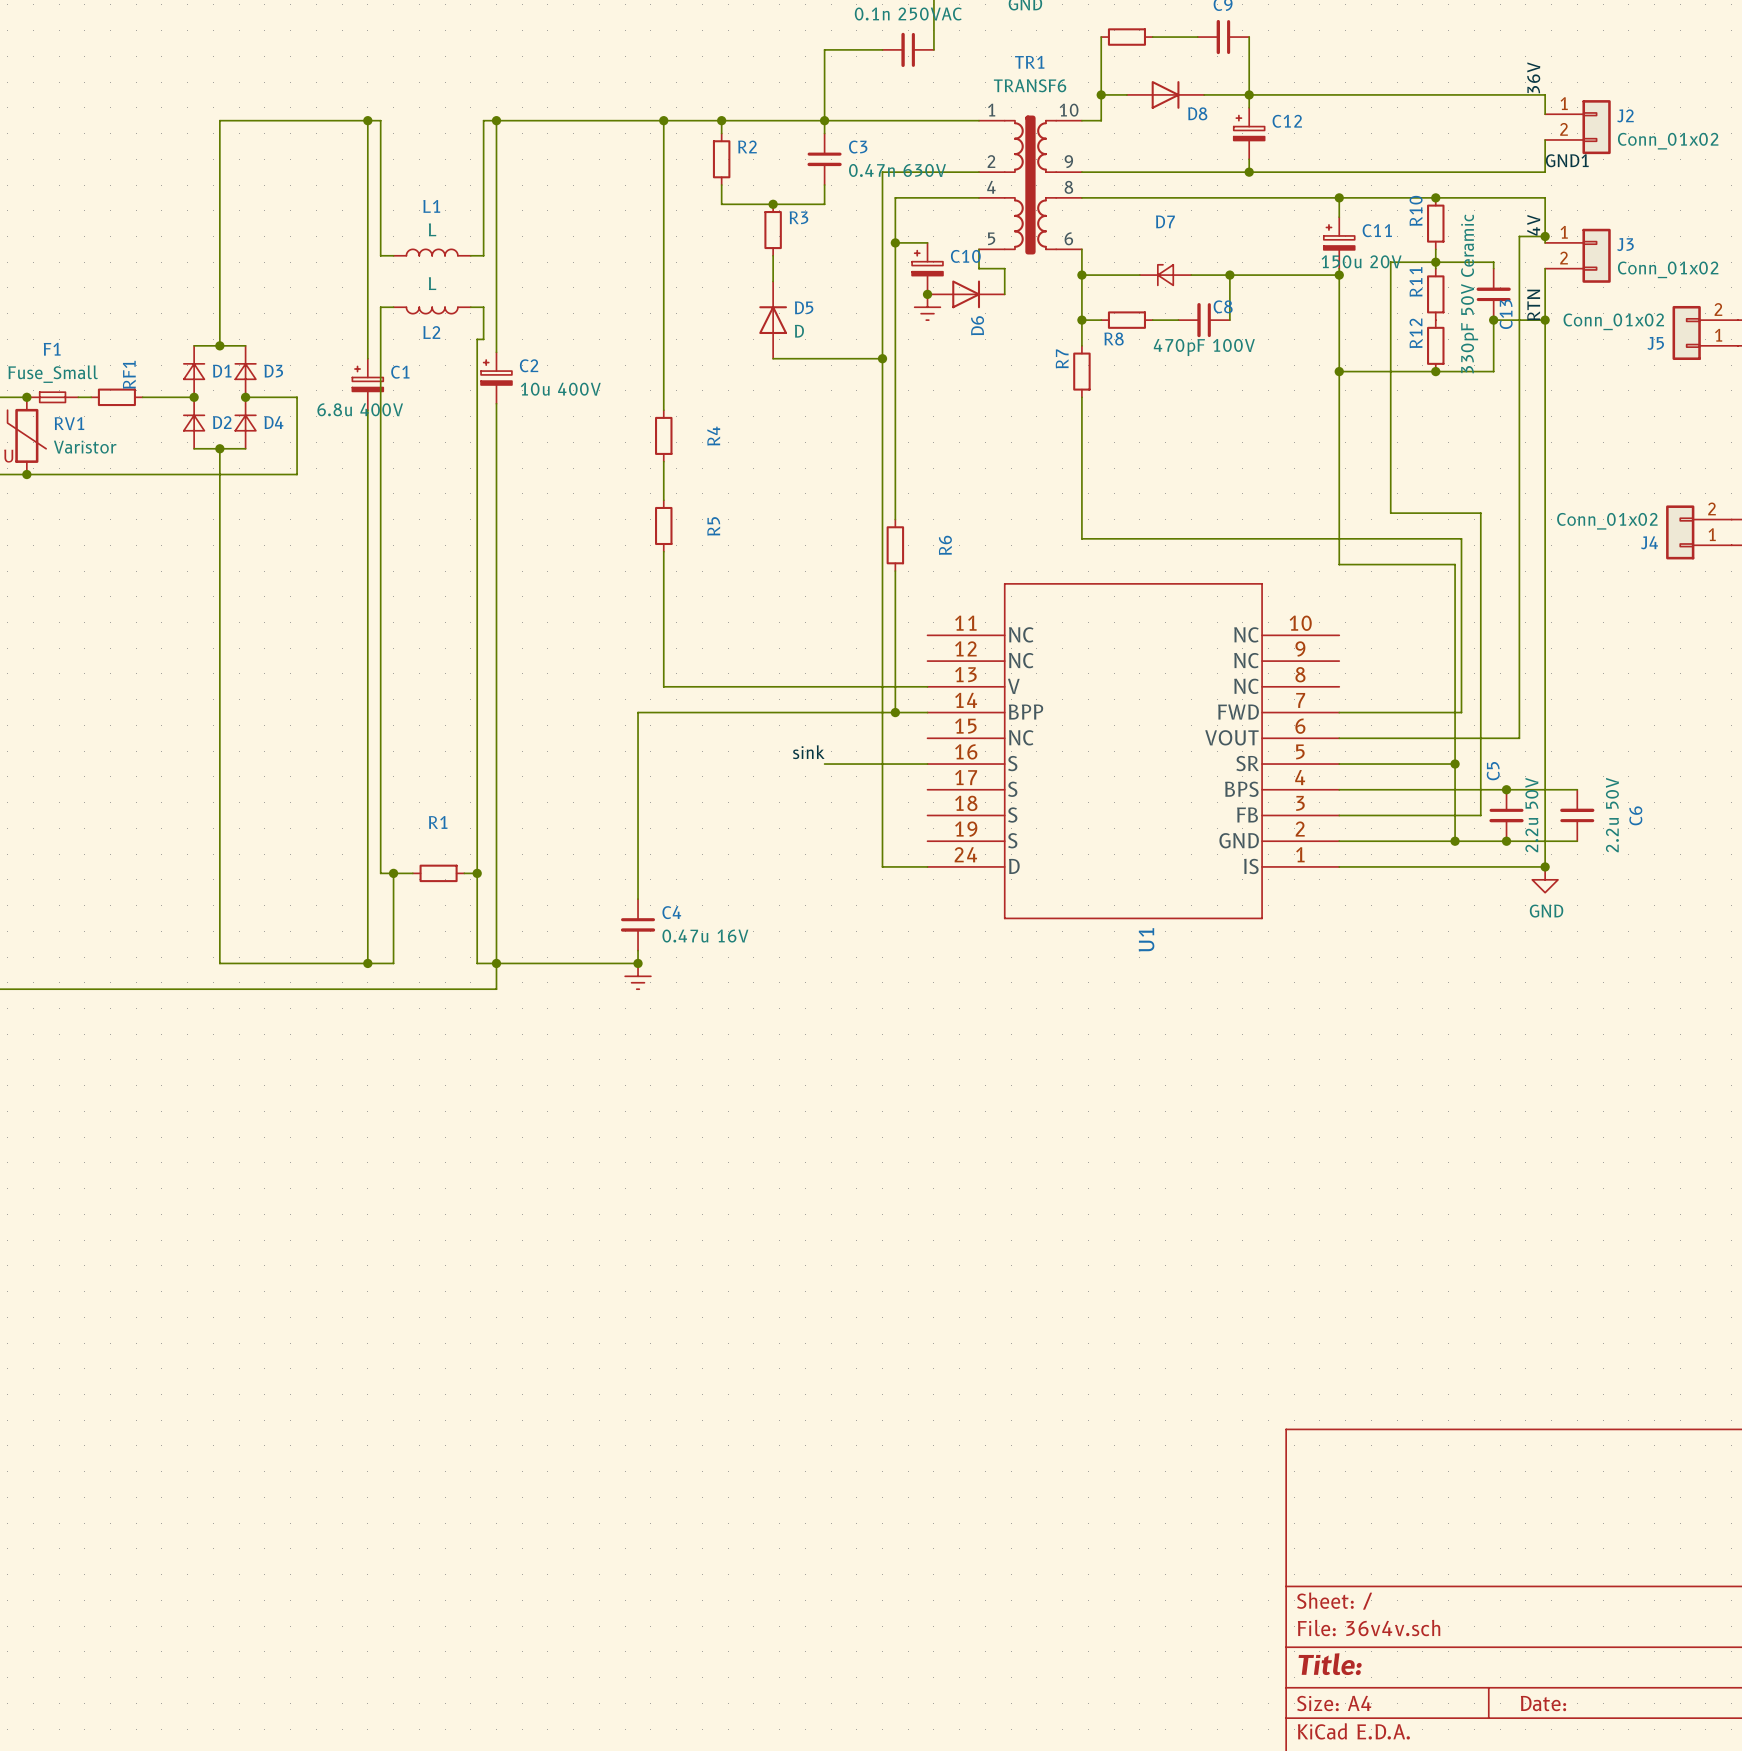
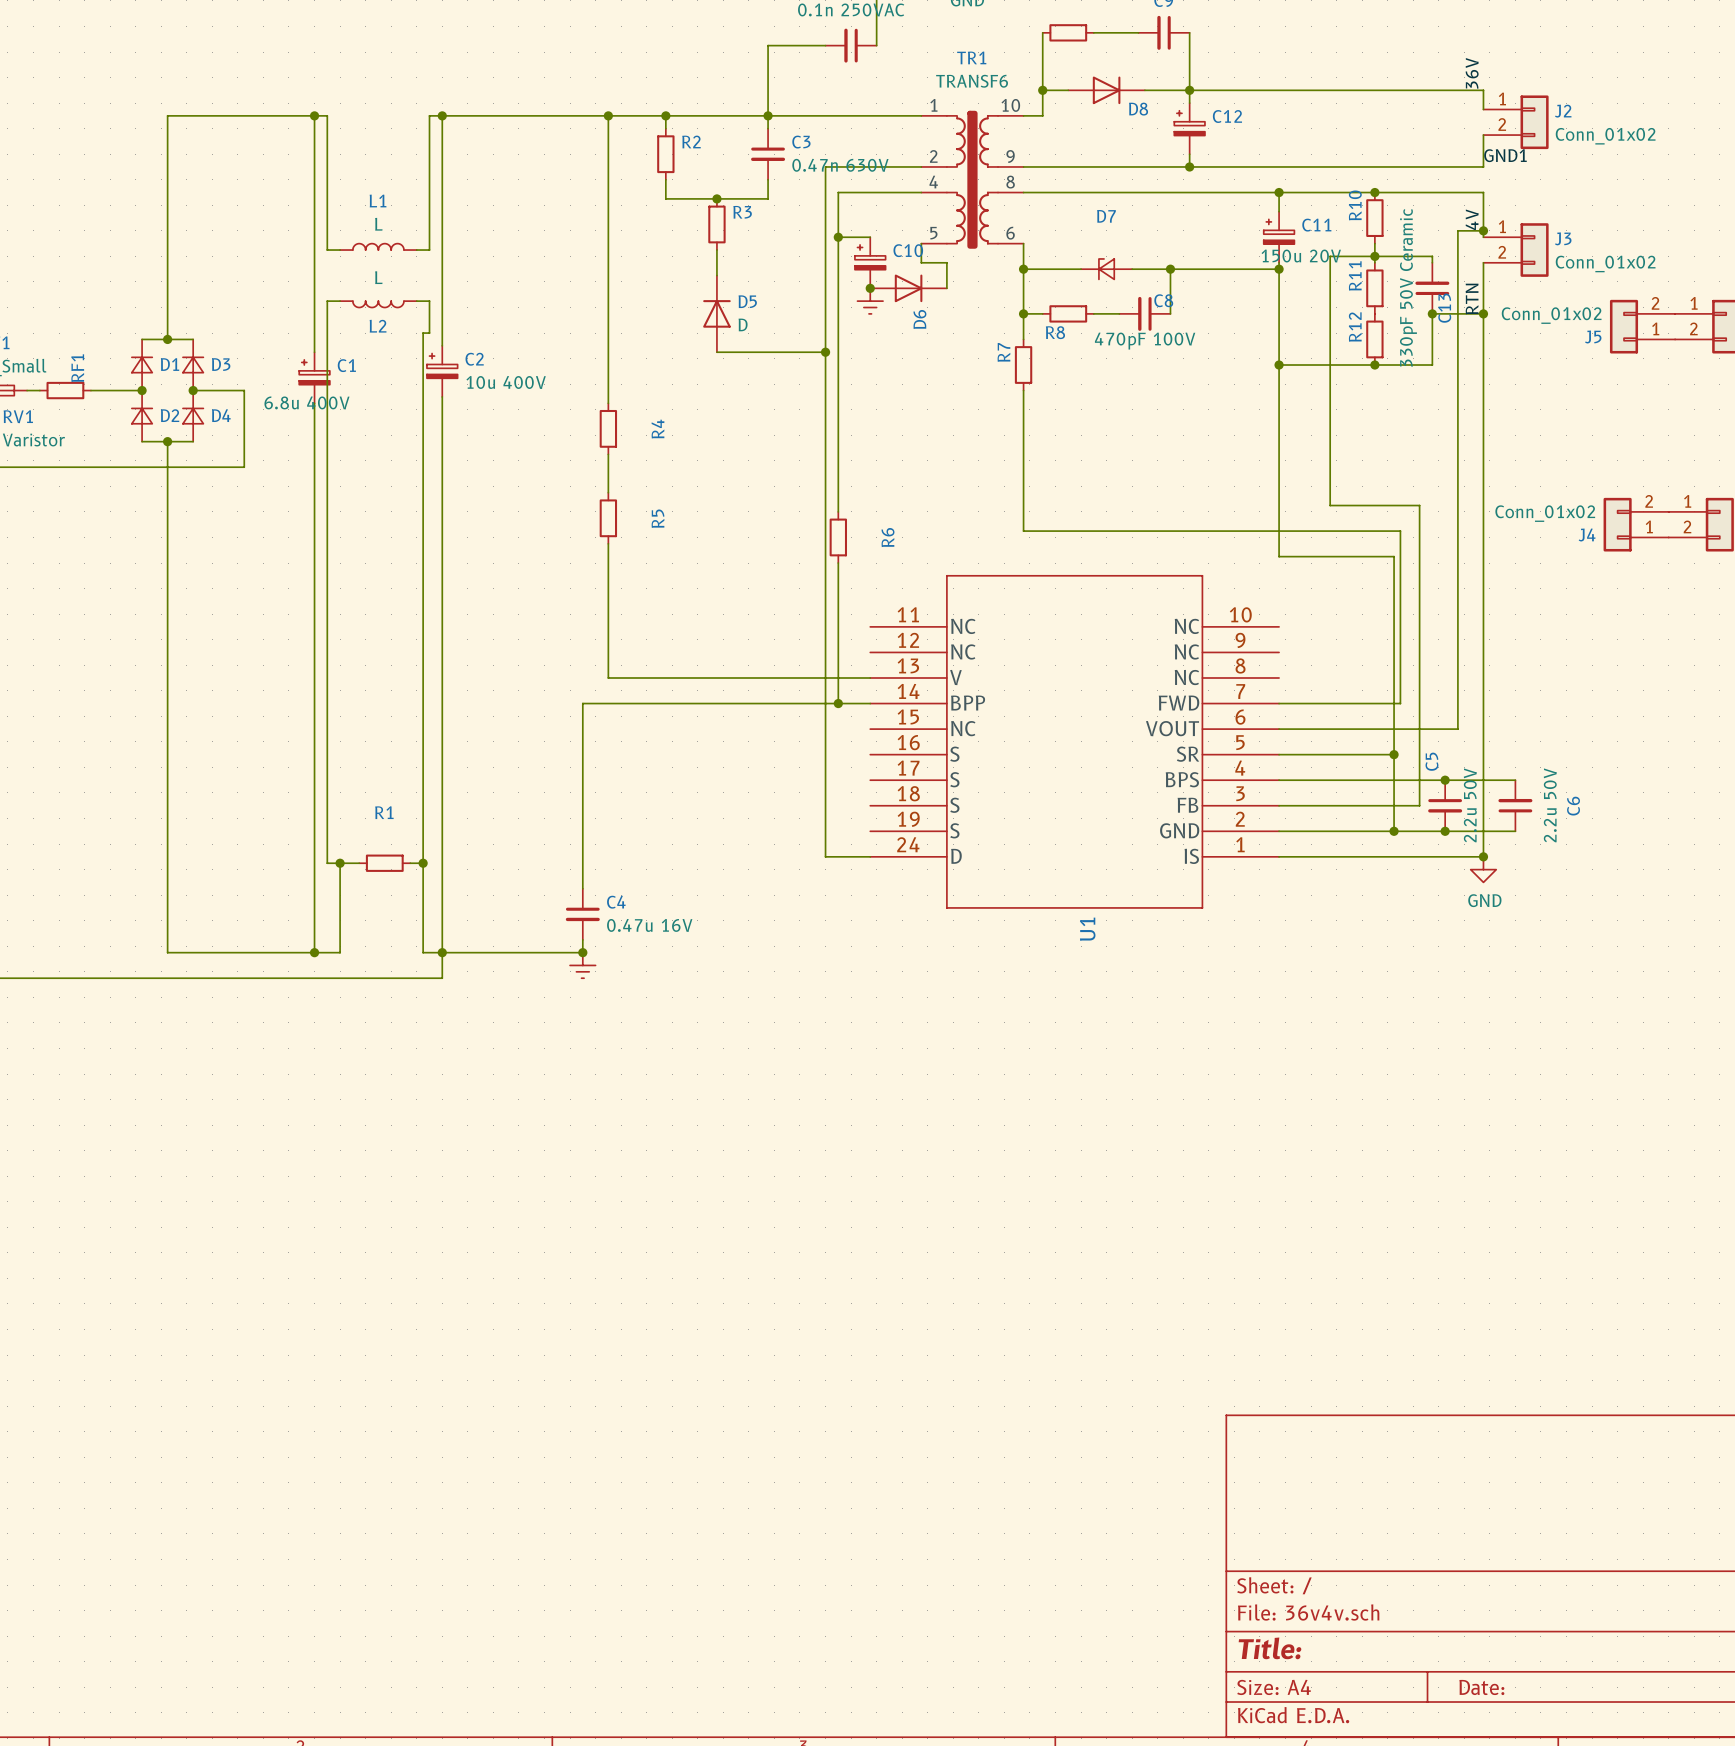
label: sink (808, 752) -> none
wire: (824, 764) (927, 764) -> none

